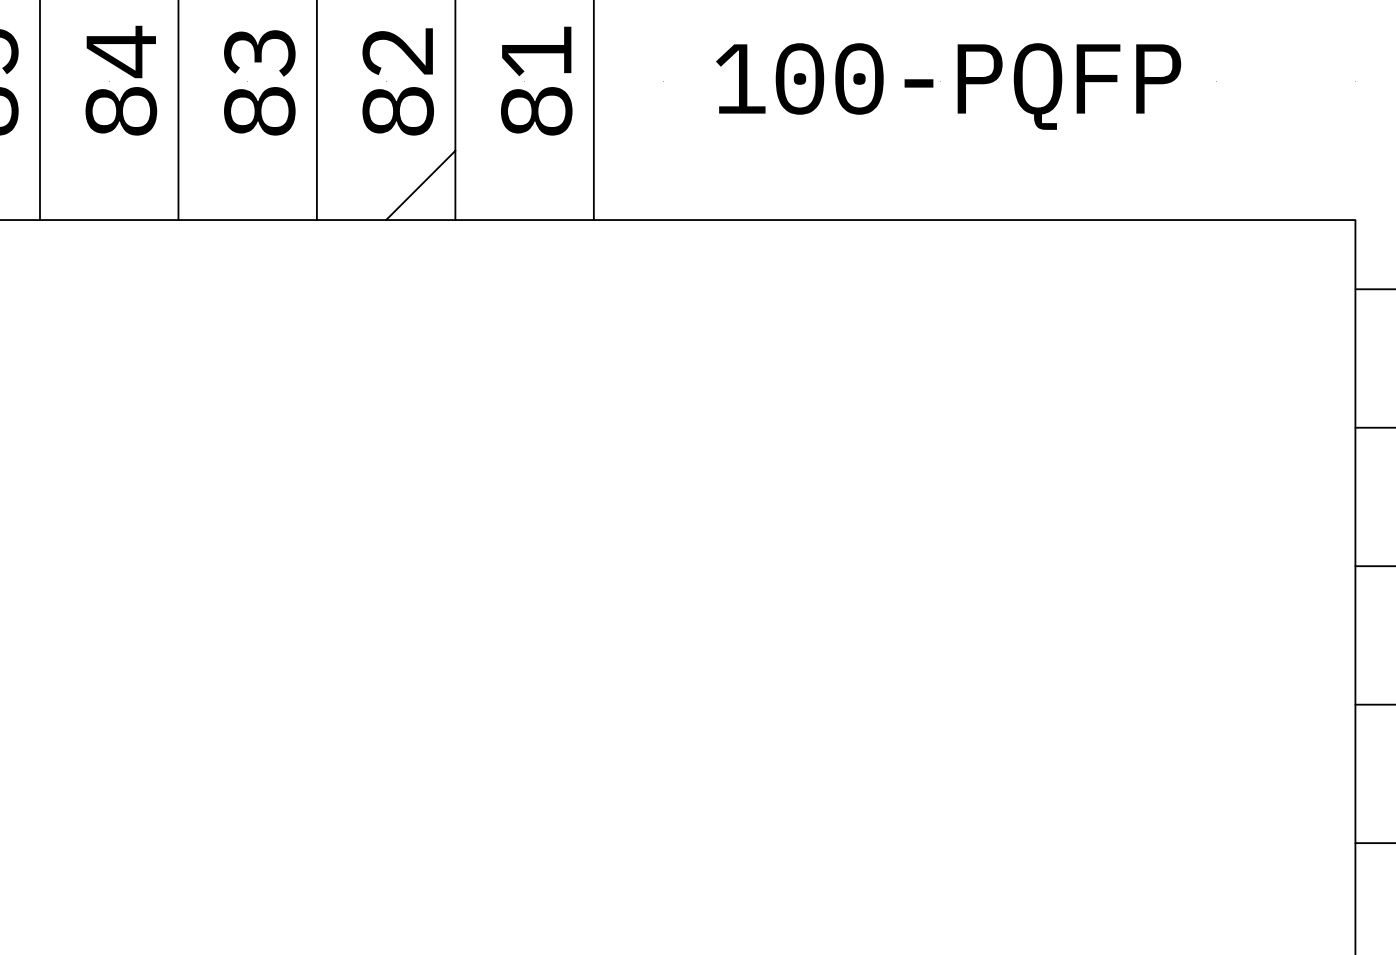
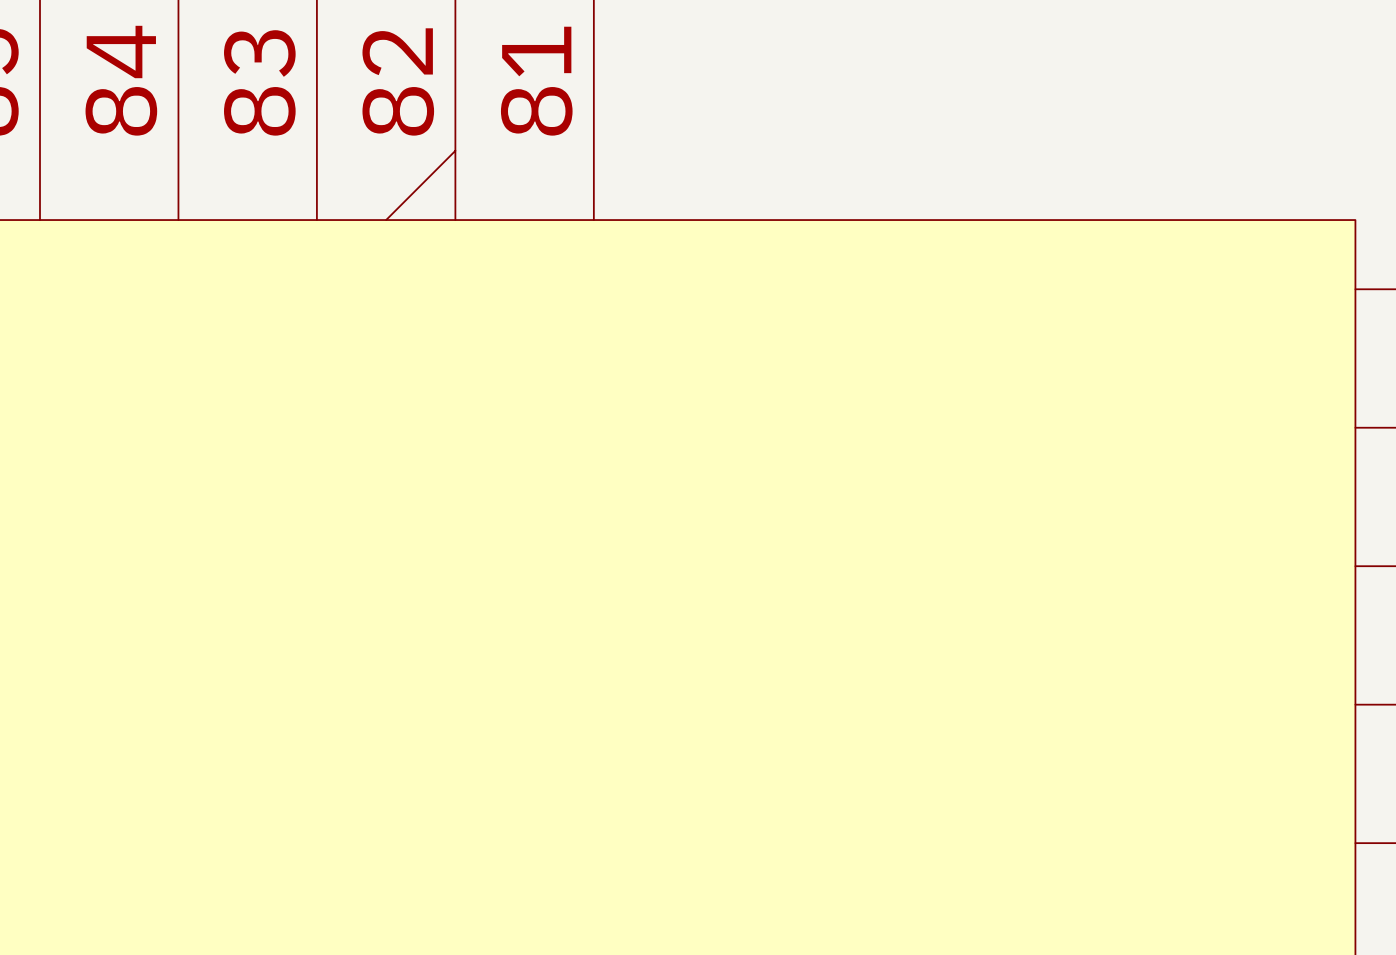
part value: 100-PQFP (948, 86) -> none

